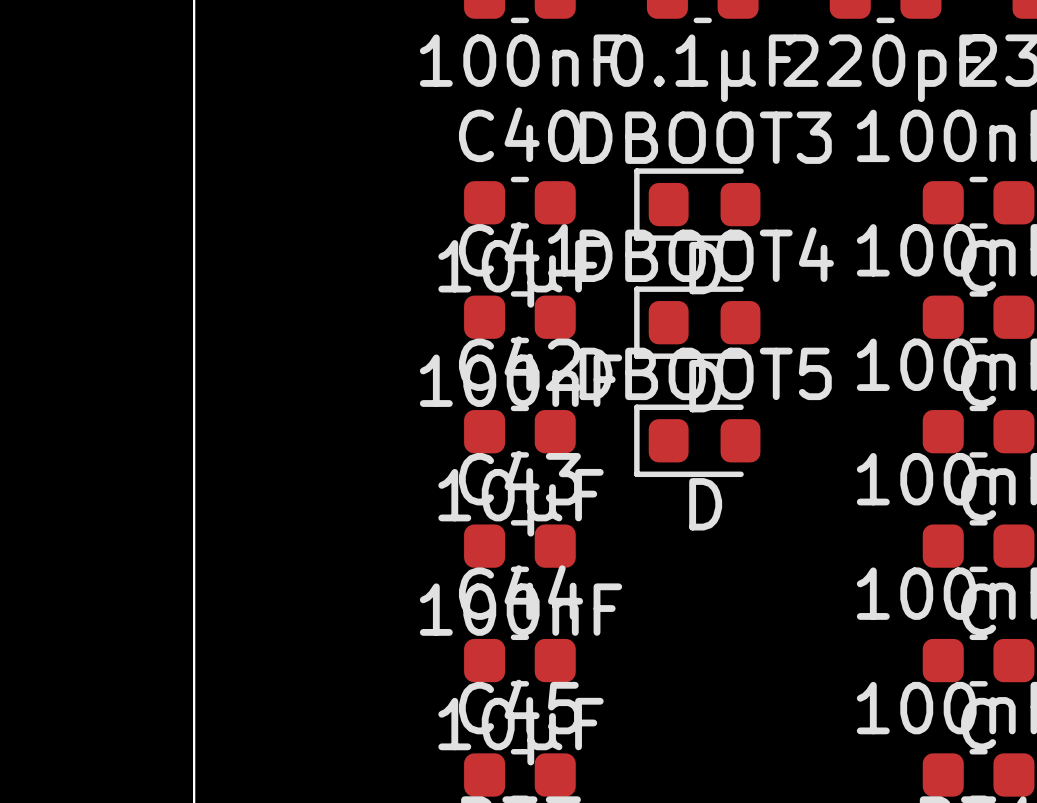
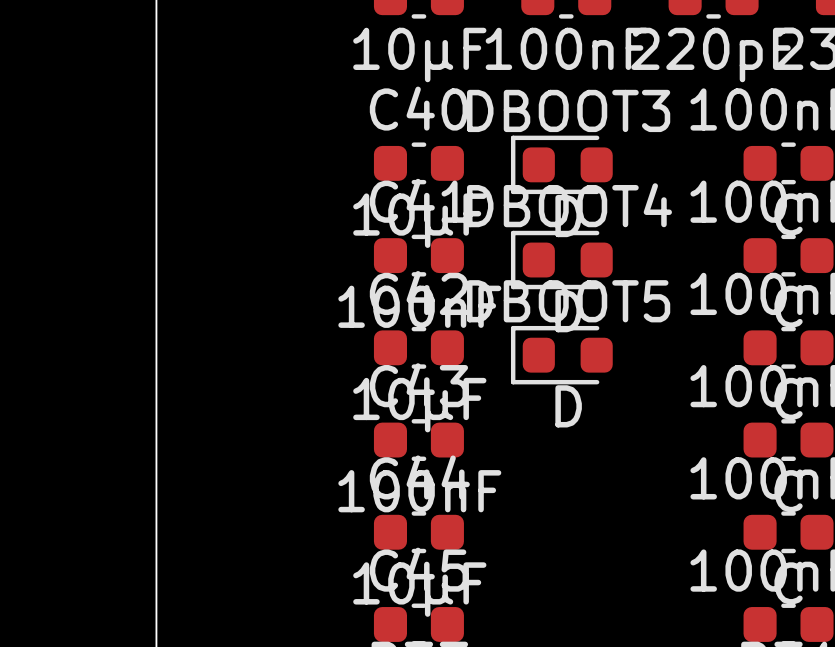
part value: 100nF (521, 60) -> 10µF (419, 54)
part value: 0.1µF (703, 68) -> 100nF (567, 48)

